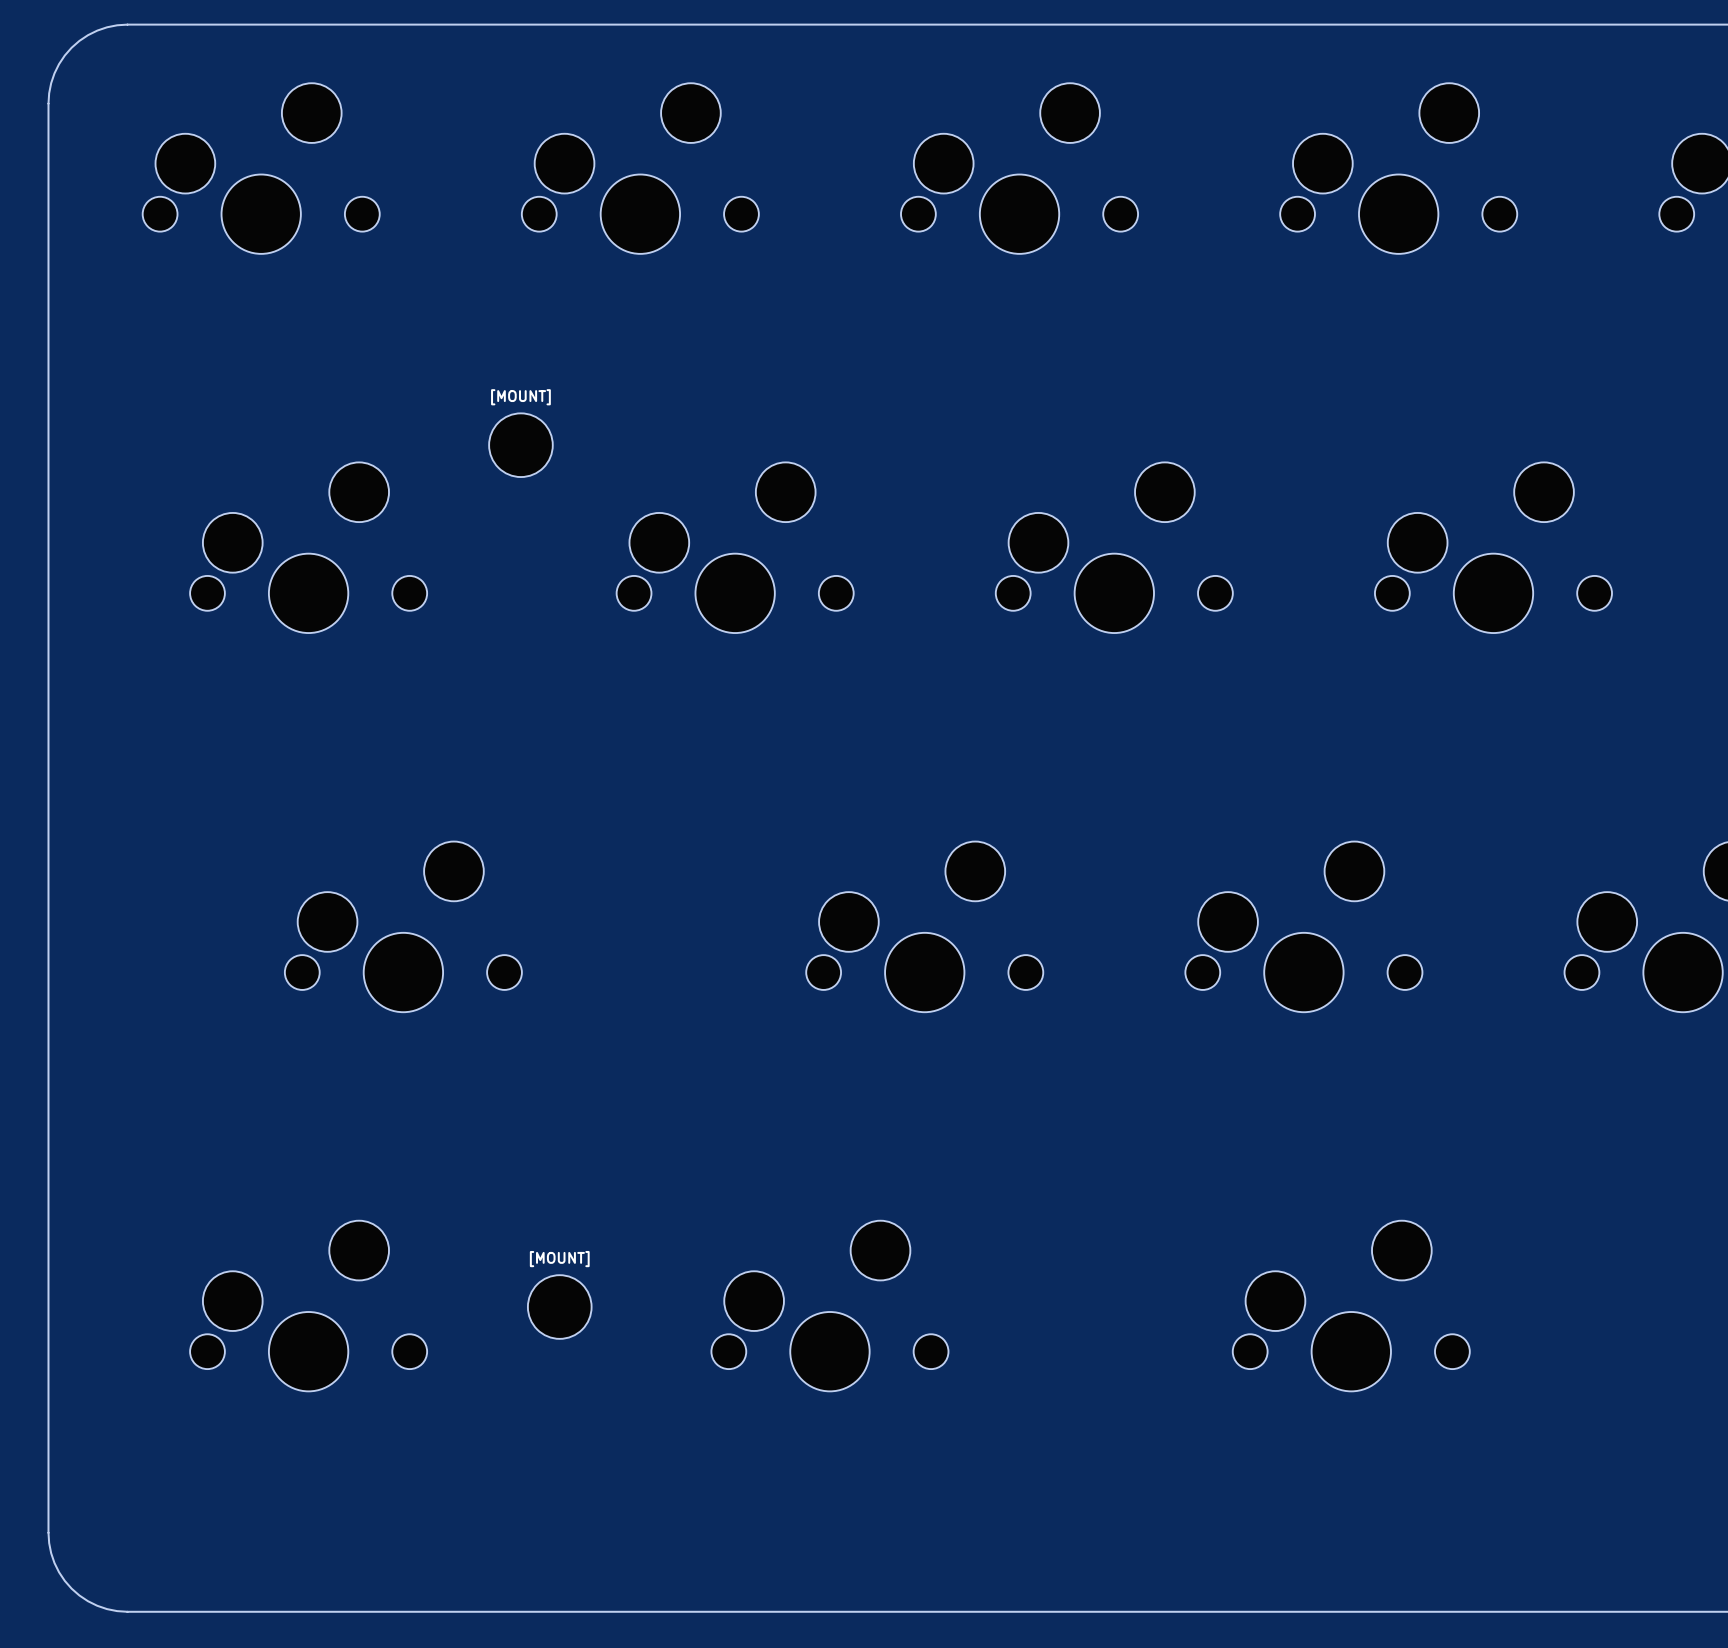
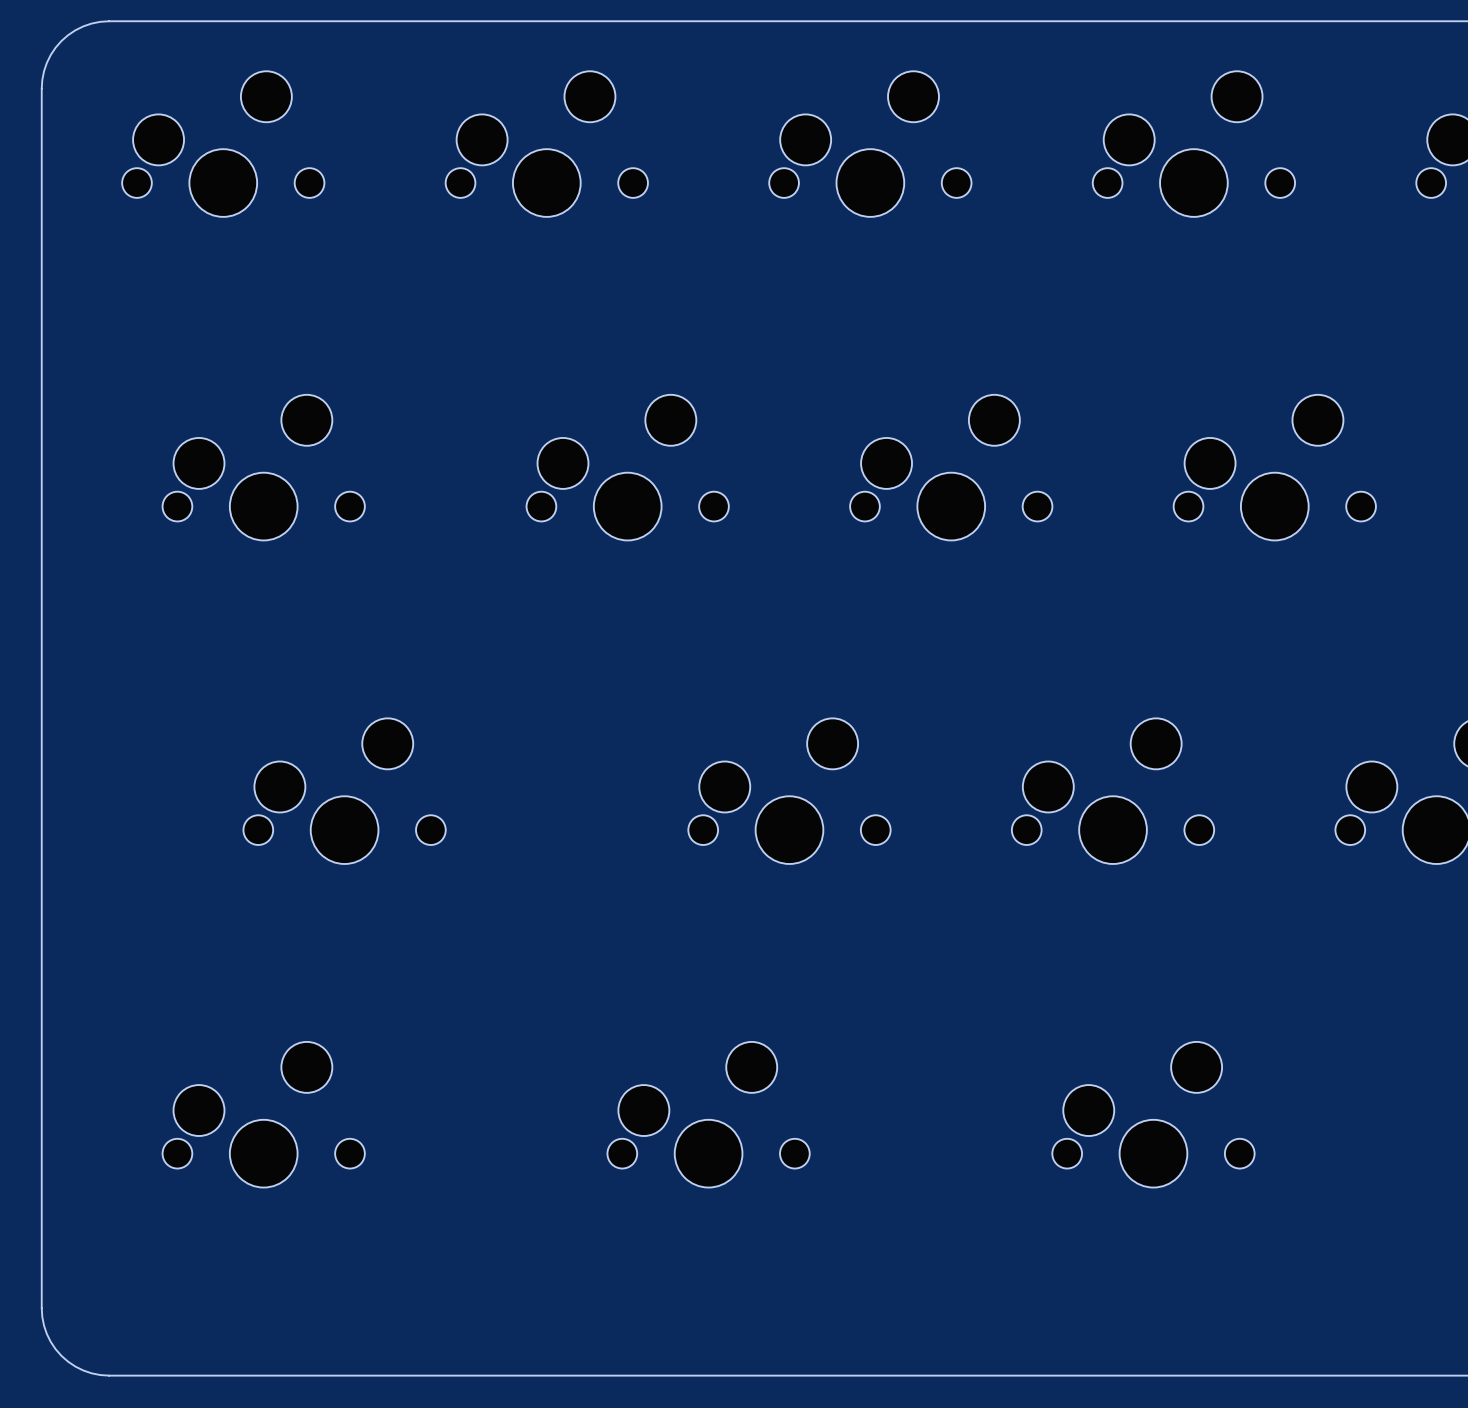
[MOUNT]: (520, 445) -> none
[MOUNT]: (559, 1307) -> none

